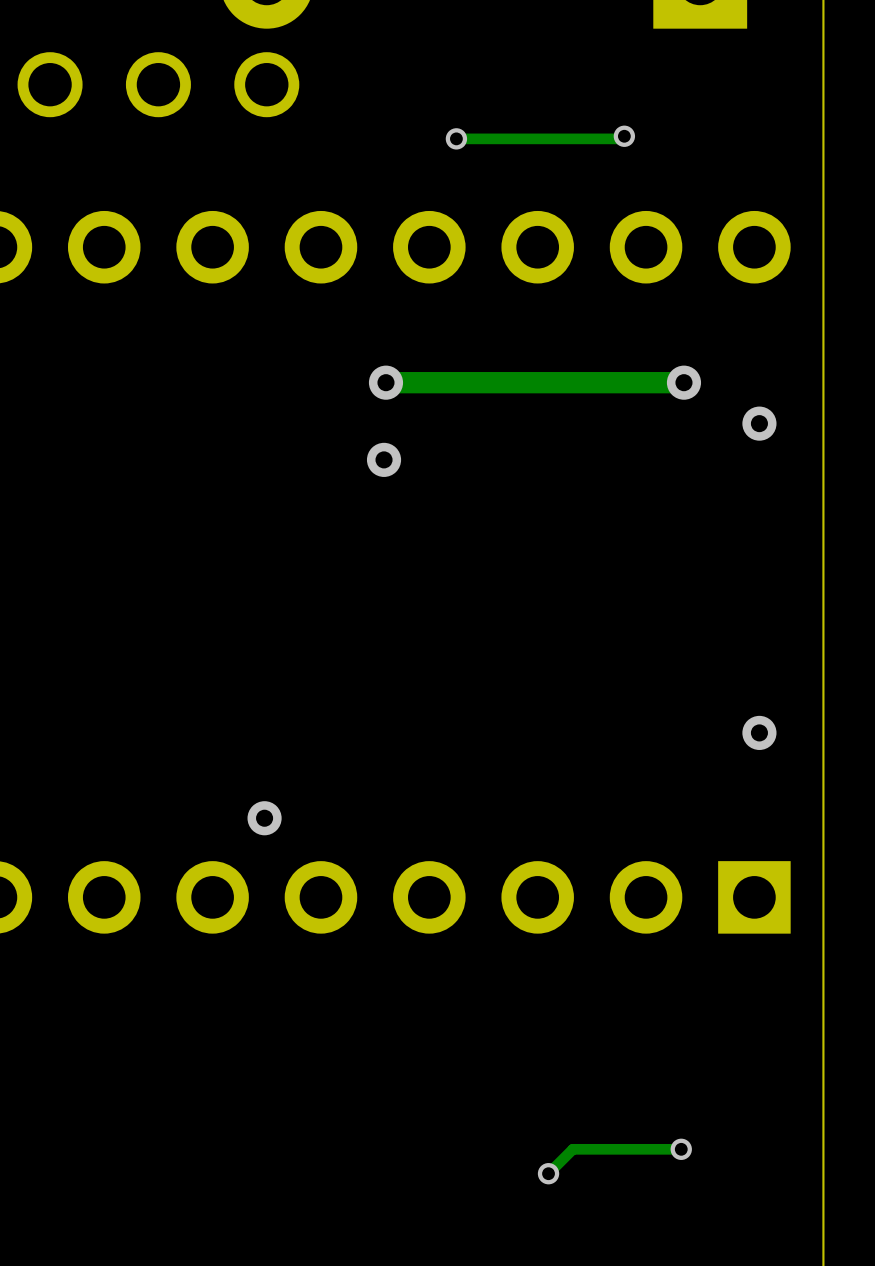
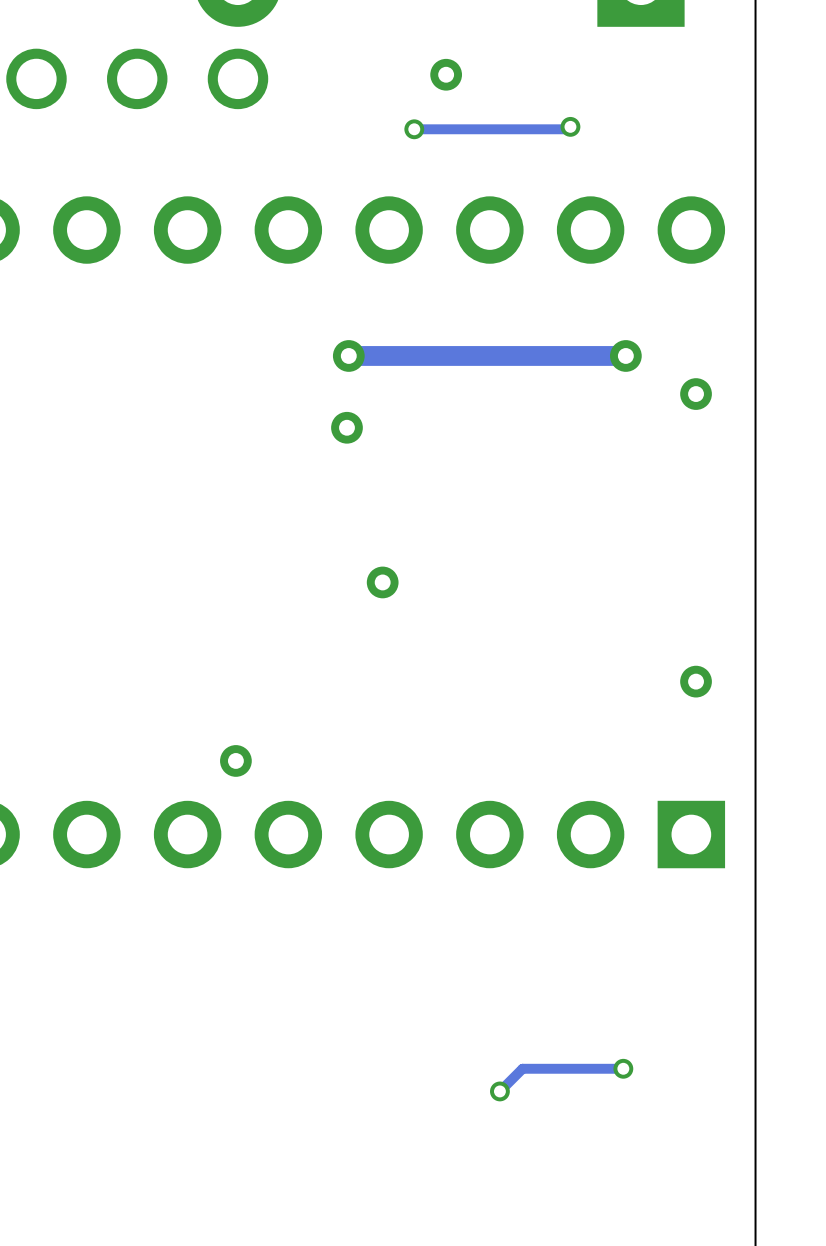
via: none -> (446, 74)
via: none -> (382, 582)

